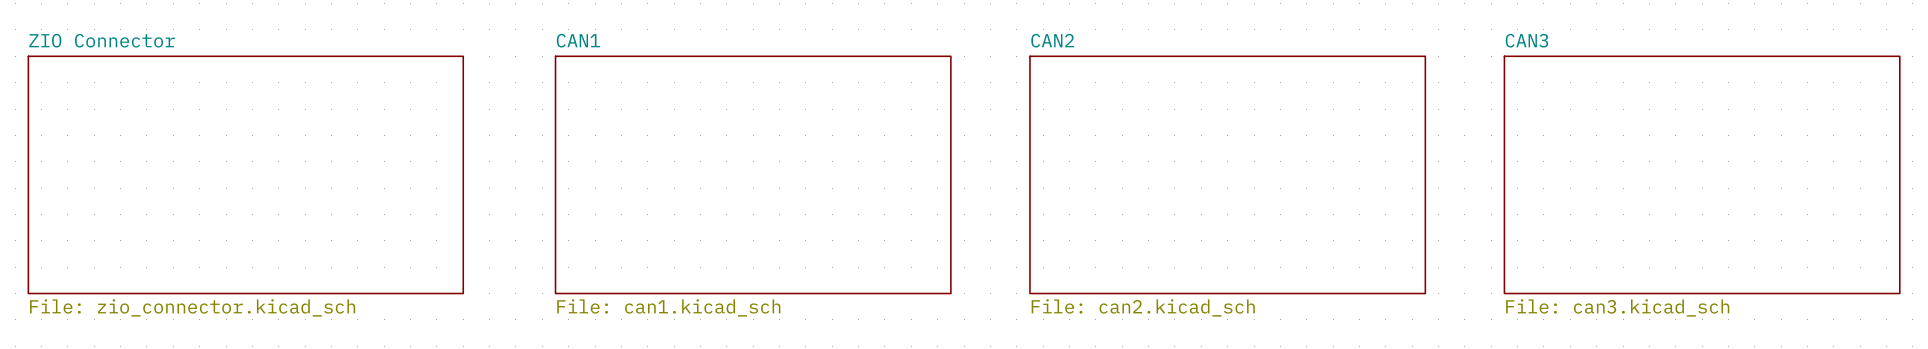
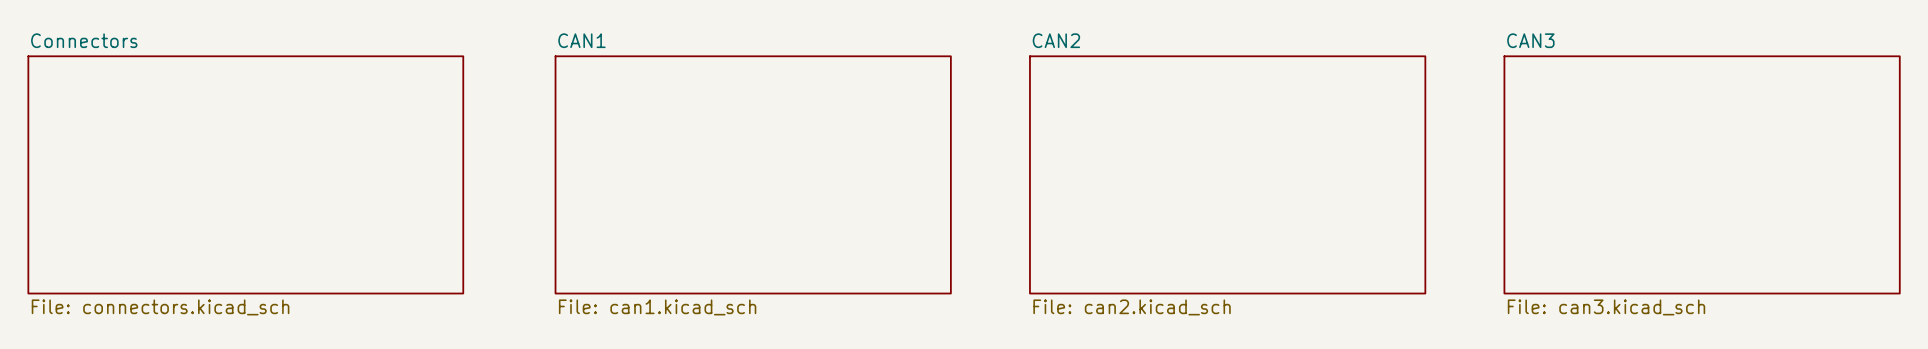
sheet ZIO Connector name: ZIO Connector (102, 40) -> Connectors (84, 40)
sheet ZIO Connector value: File: zio_connector.kicad_sch (192, 307) -> File: connectors.kicad_sch (160, 307)

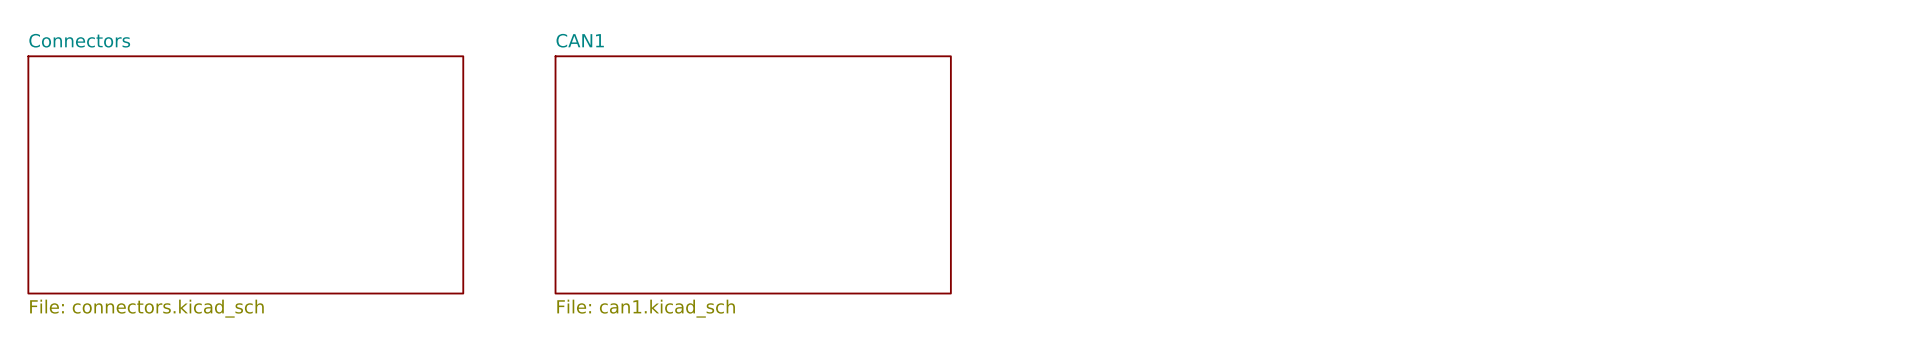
sheet CAN2: File: can2.kicad_sch (1227, 174) -> none
sheet CAN3: File: can3.kicad_sch (1702, 174) -> none

